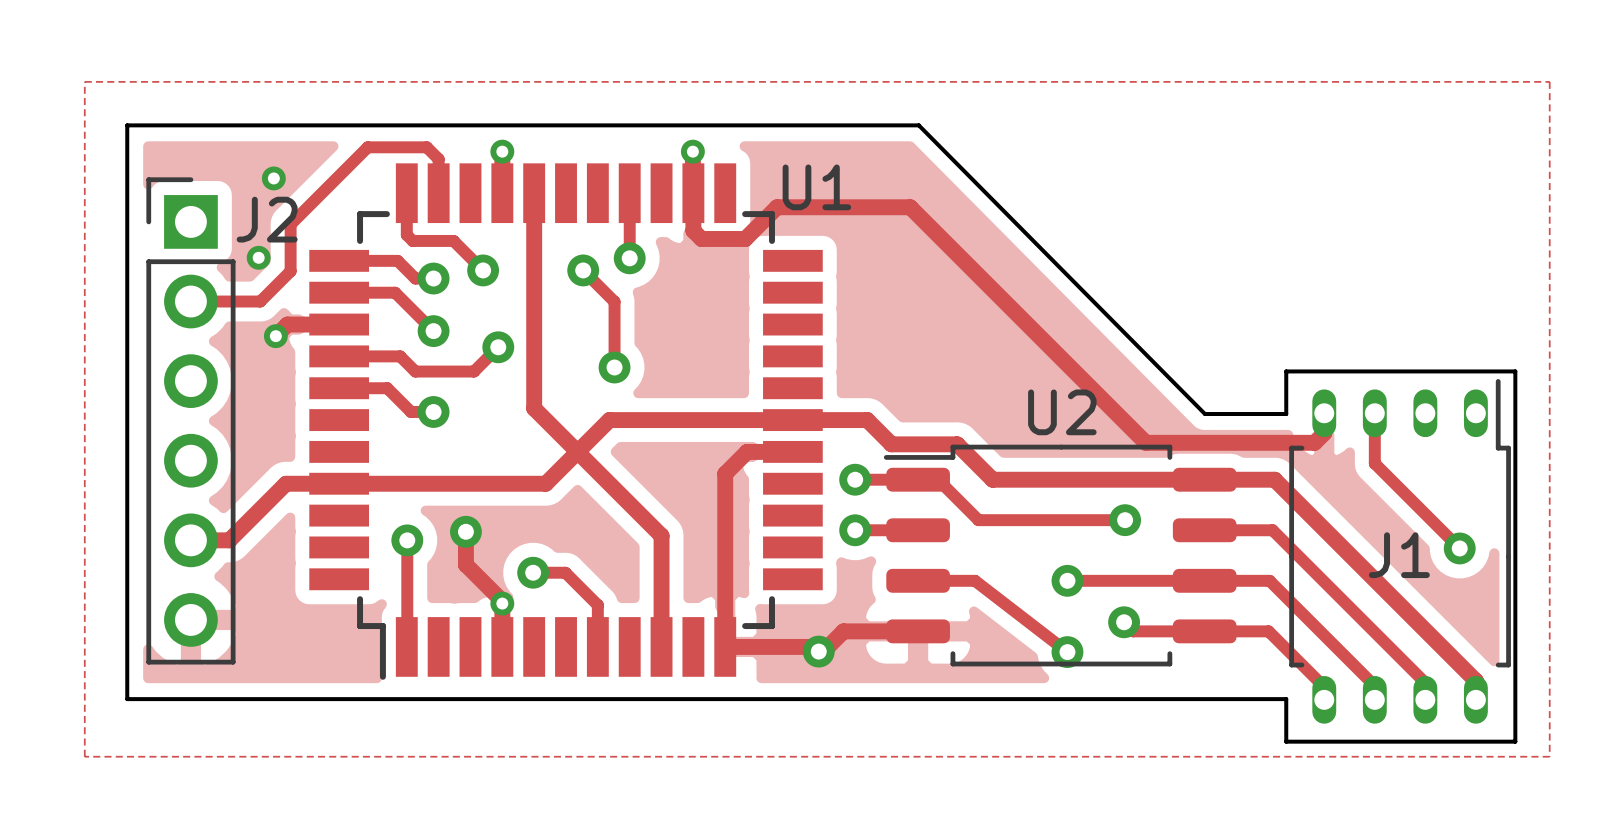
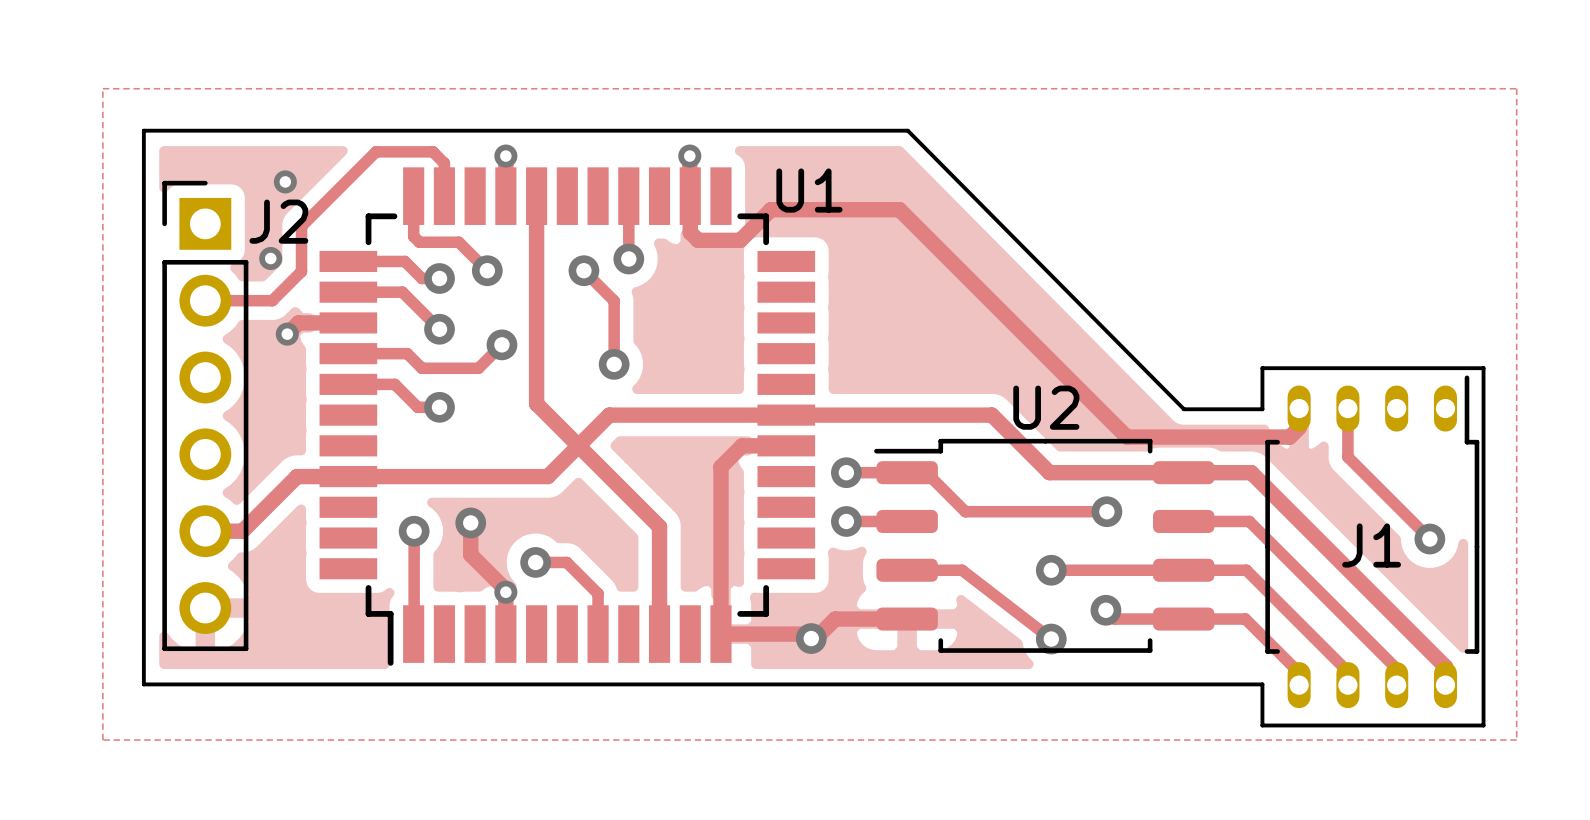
track: (867, 420) (891, 444) (957, 444) (992, 479) (1065, 479) -> (858, 415) (991, 415) (1049, 472)

